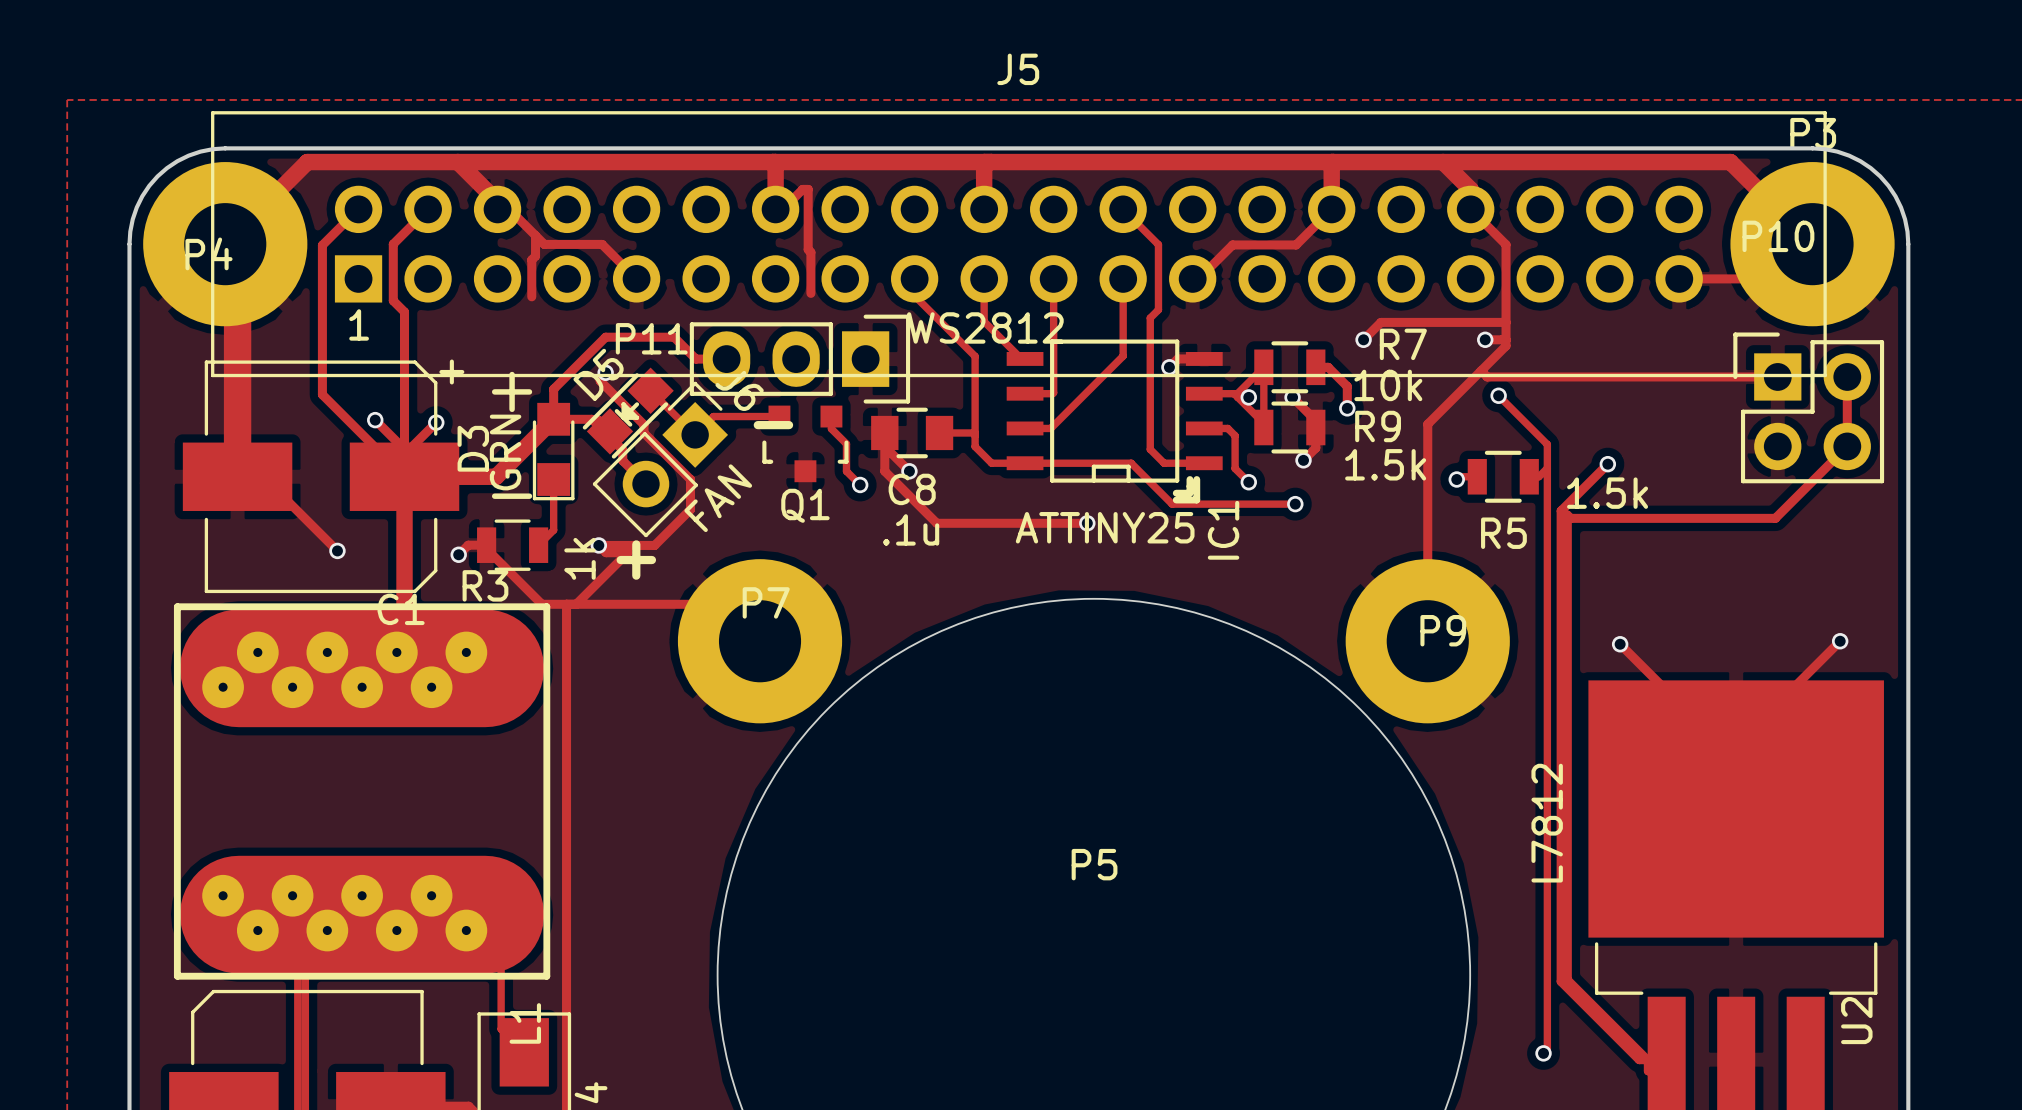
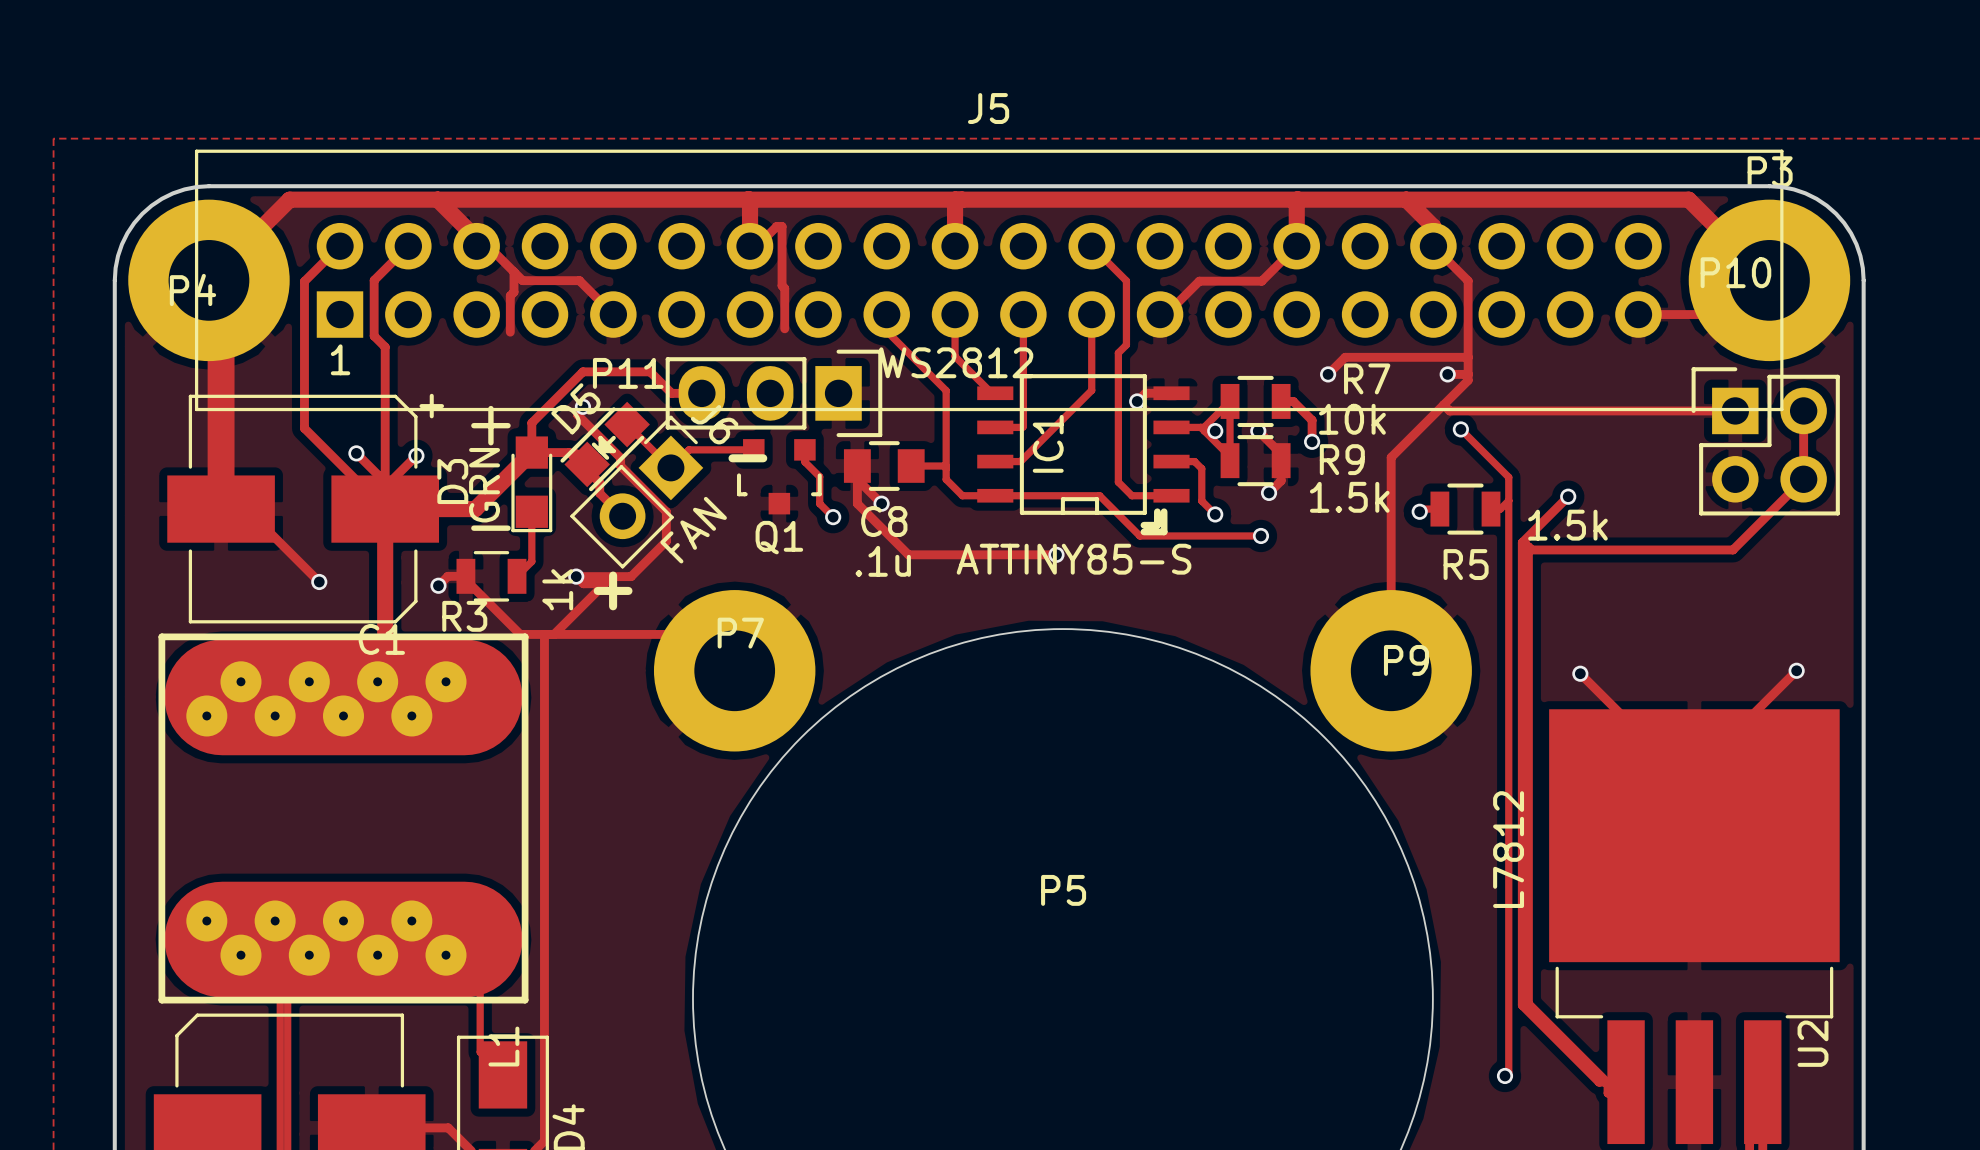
IC1 value: ATTINY25 (1105, 527) -> ATTINY85-S (1074, 559)
IC1 name position: IC1 (1223, 530) -> IC1 (1048, 443)

